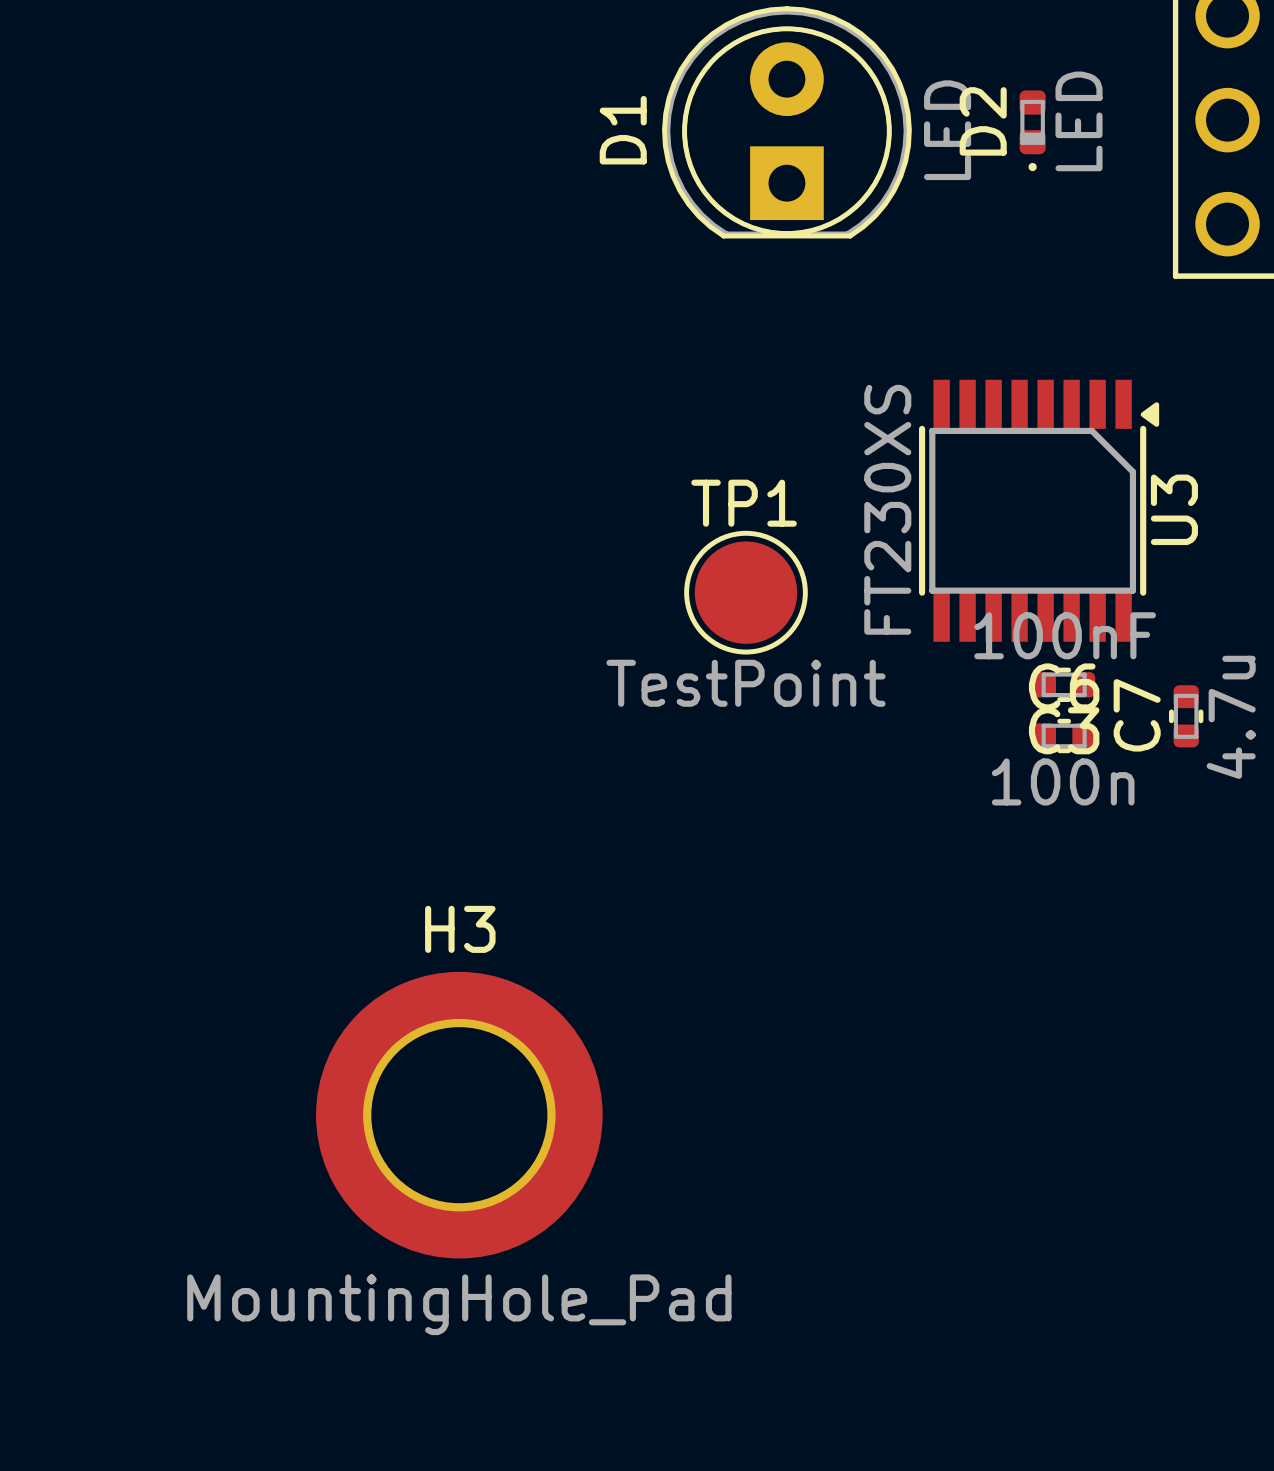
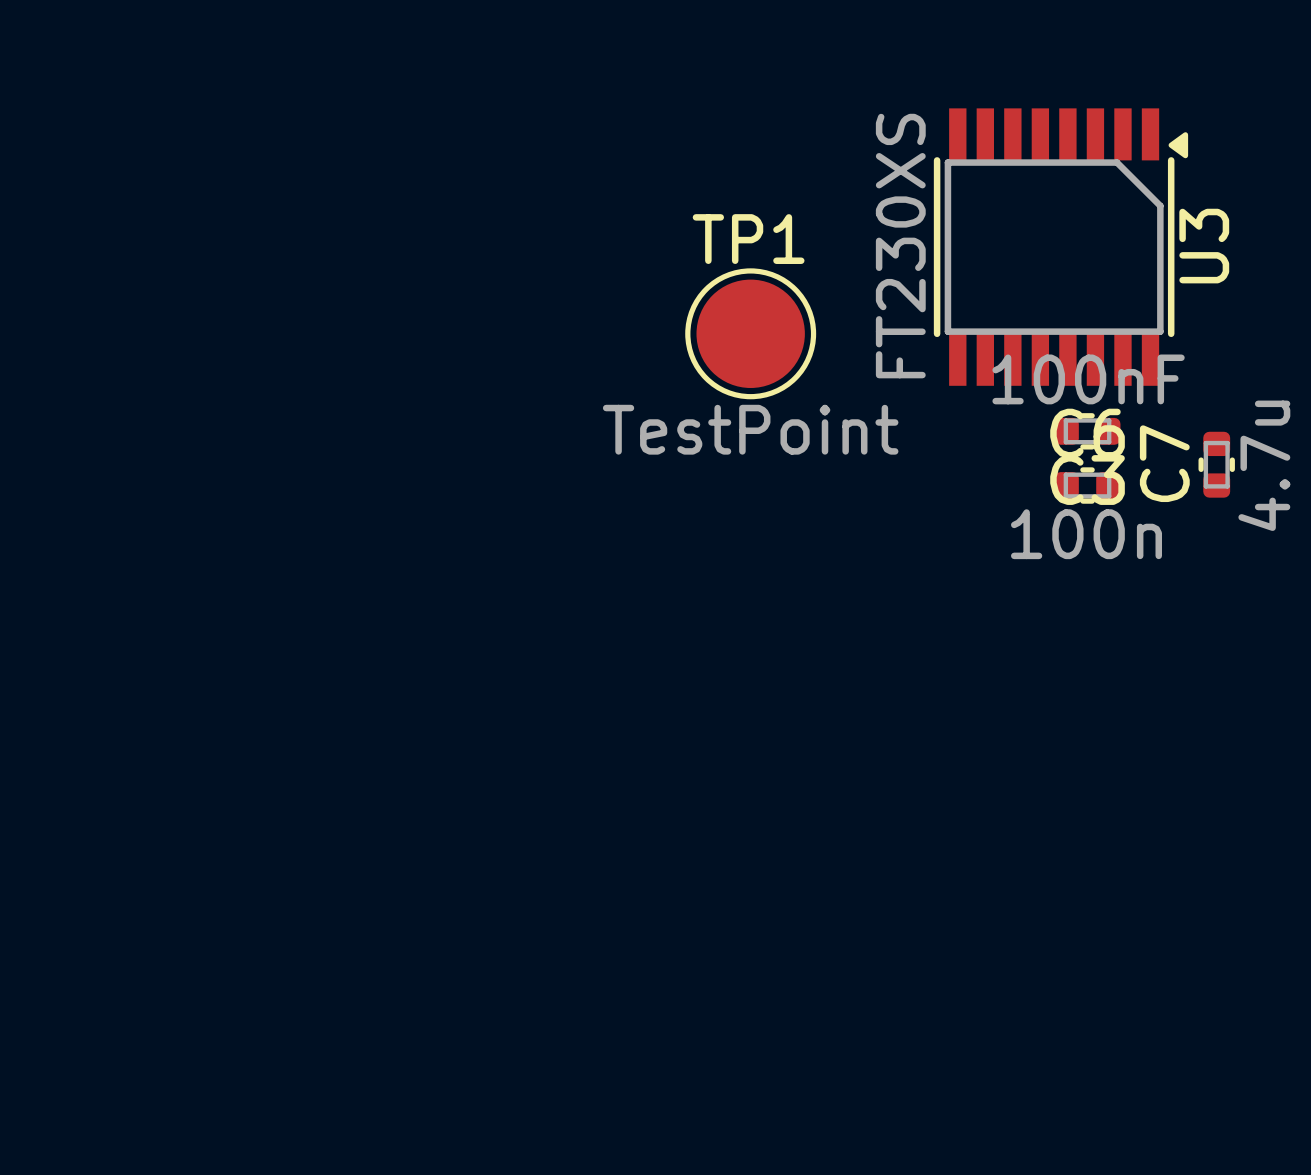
H3: MountingHole_Pad (459, 1115) -> none

